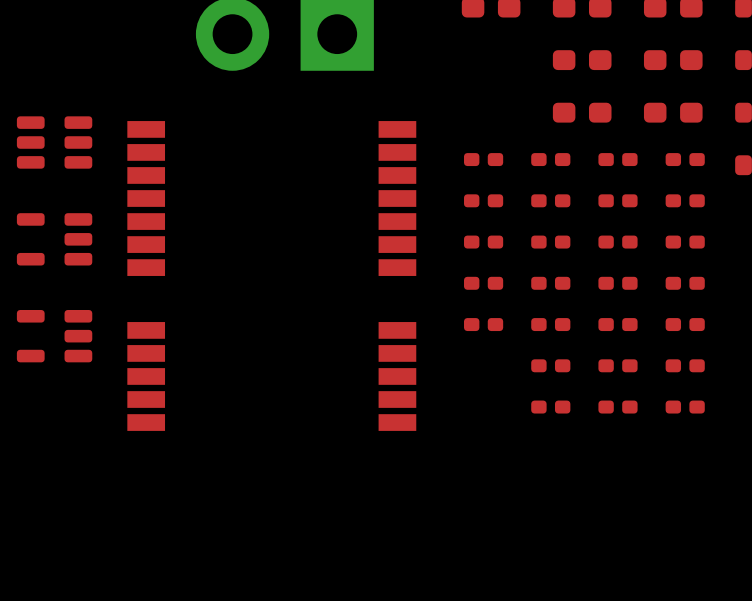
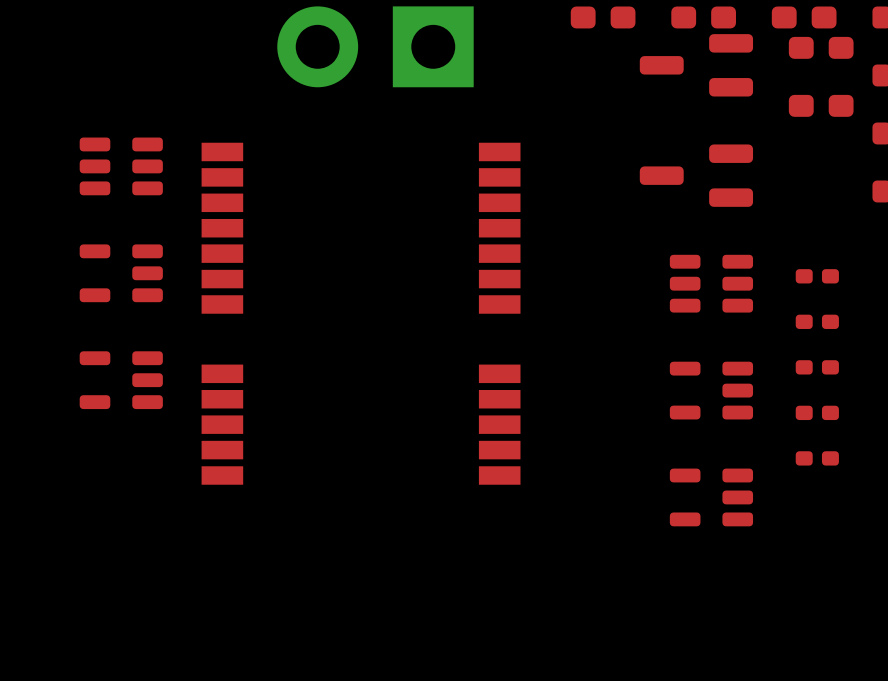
part: none -> (821, 47)
part footprint: [552, 50, 612, 71] -> [639, 34, 754, 97]
part: (673, 60) -> none
part: none -> (821, 105)
part: (582, 112) -> none
part: (673, 112) -> none
part: none -> (696, 175)
part: (483, 159) -> none
part: (550, 159) -> none
part: (618, 159) -> none
part: (685, 159) -> none
part: (483, 200) -> none
part: (550, 200) -> none
part: (618, 200) -> none
part: (685, 200) -> none
part: (483, 242) -> none
part: (550, 242) -> none
part: (618, 242) -> none
part: none -> (711, 283)
part: (483, 283) -> none
part: (550, 283) -> none
part: (618, 283) -> none
part: (483, 324) -> none
part: (550, 324) -> none
part: (618, 324) -> none
part: none -> (711, 390)
part: (550, 365) -> none
part: (618, 365) -> none
part: (550, 407) -> none
part: (618, 407) -> none
part: none -> (711, 497)

